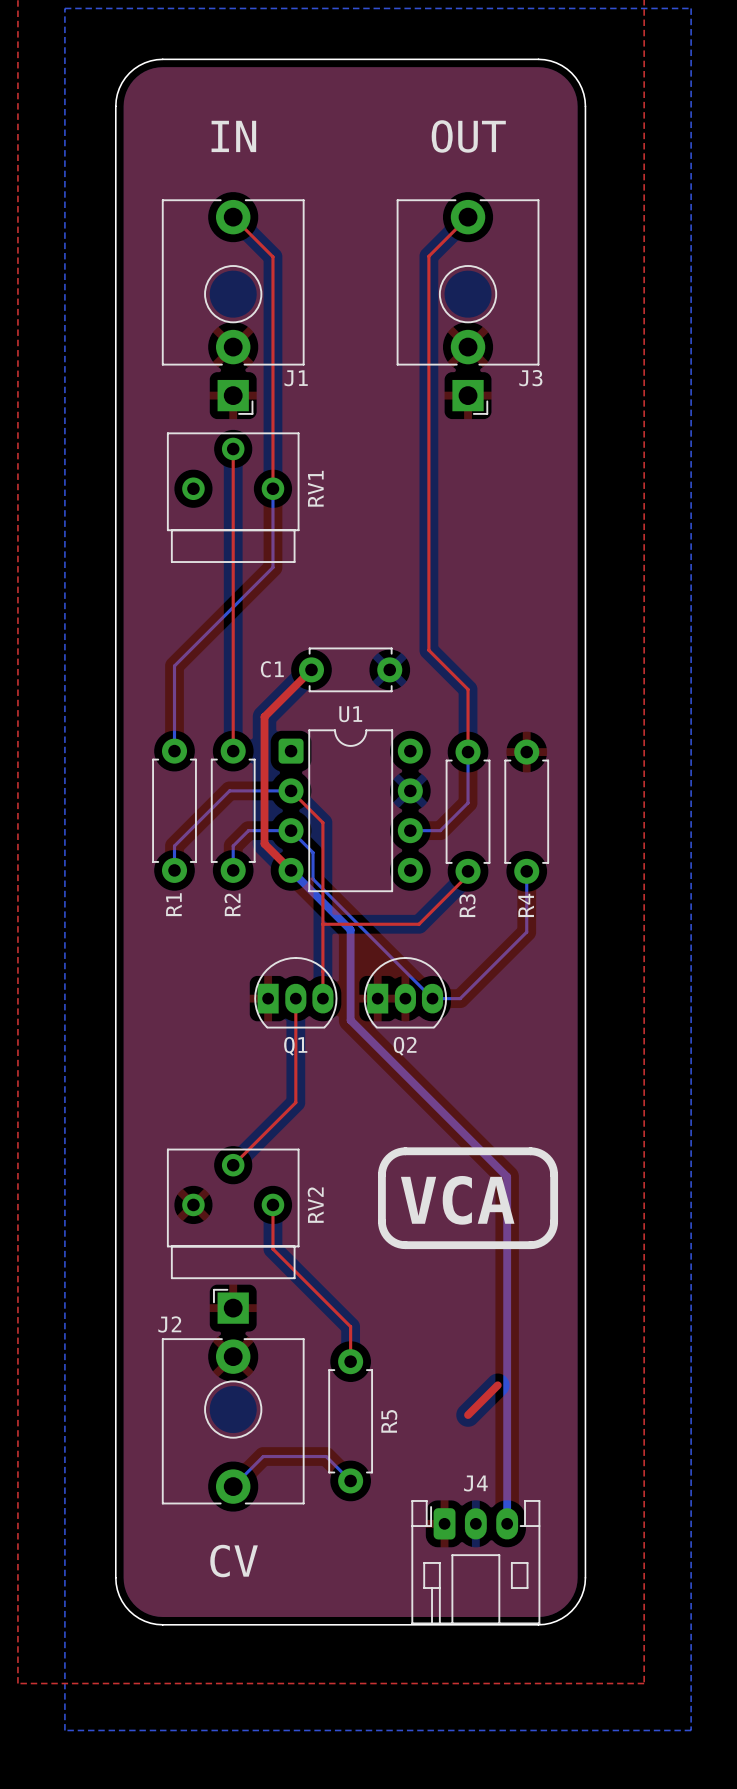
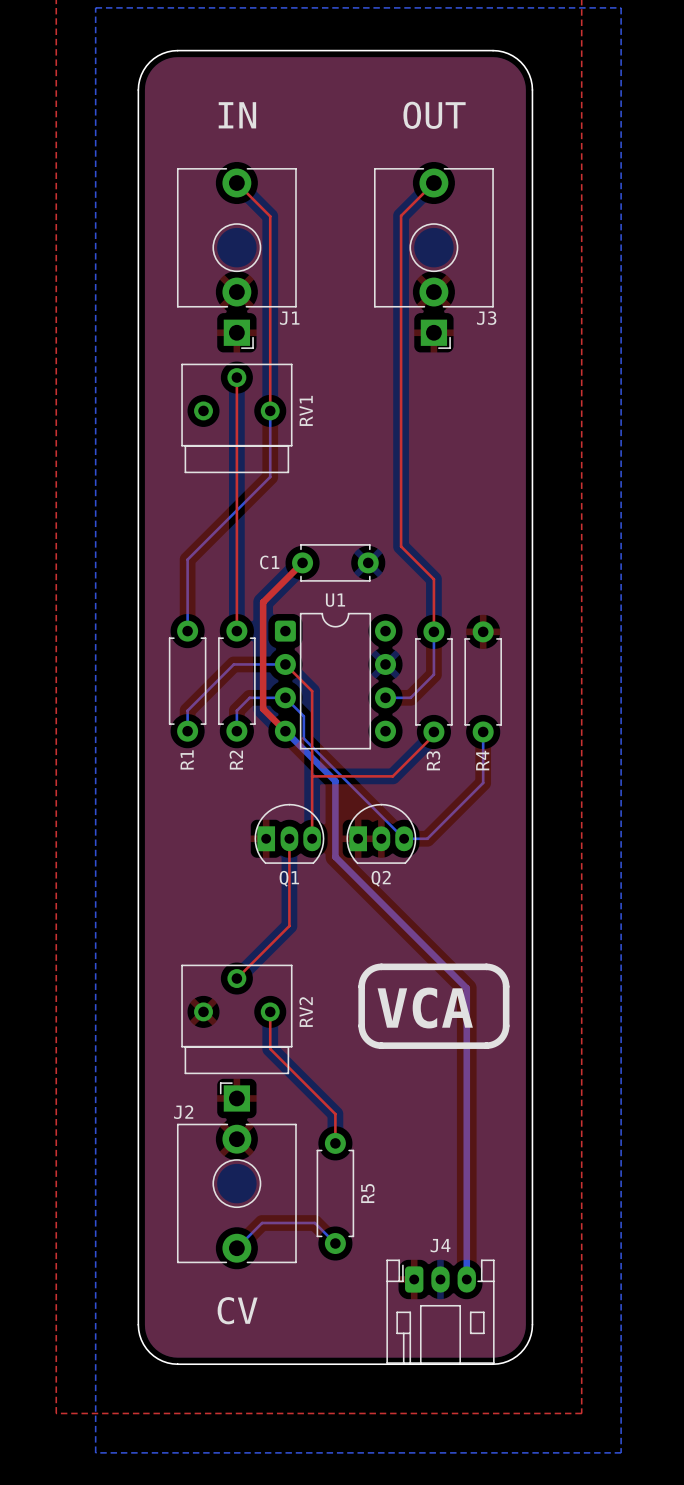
top track: (497, 1385) (468, 1415) -> none

